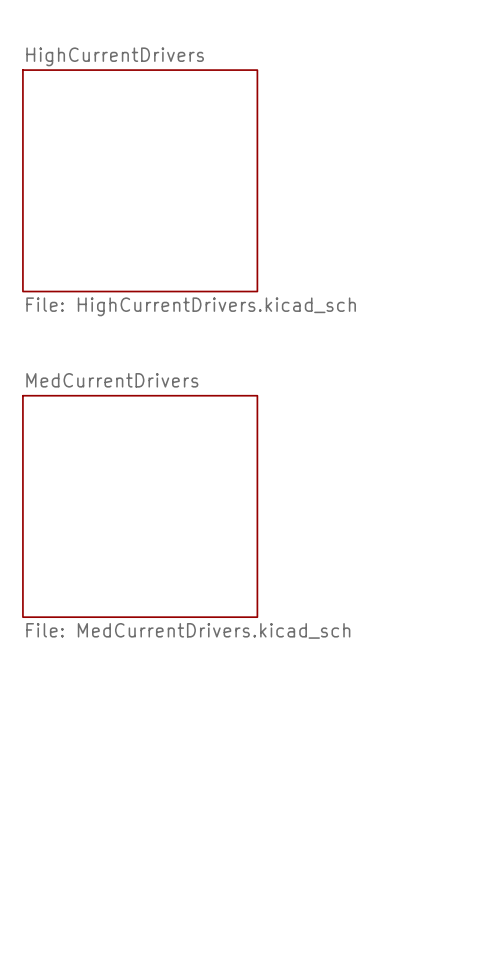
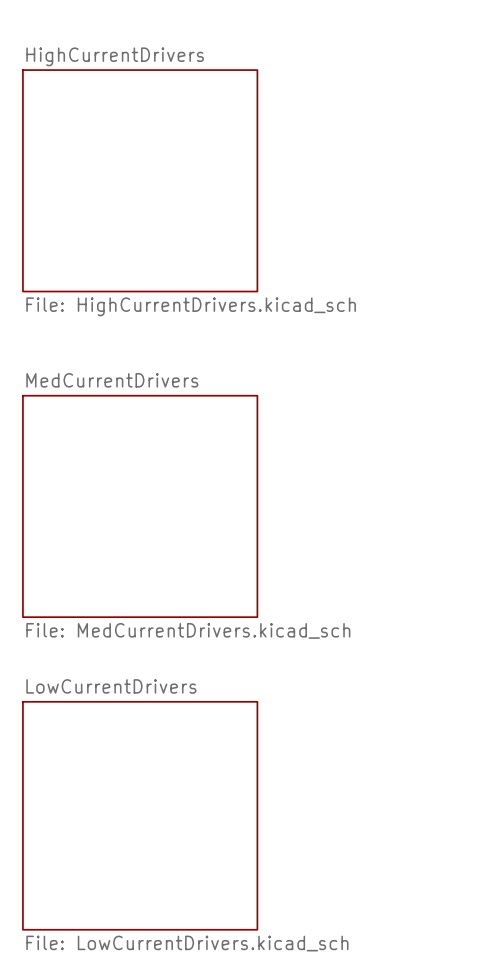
sheet LowCurrentDrivers: none -> File: LowCurrentDrivers.kicad_sch (140, 815)

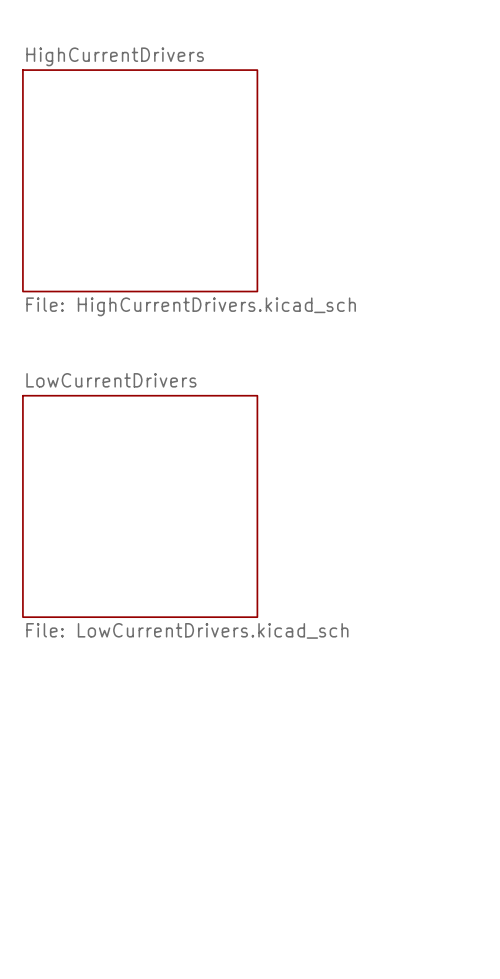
sheet MedCurrentDrivers name: MedCurrentDrivers (112, 380) -> LowCurrentDrivers (111, 380)
sheet MedCurrentDrivers value: File: MedCurrentDrivers.kicad_sch (188, 630) -> File: LowCurrentDrivers.kicad_sch (187, 630)
sheet LowCurrentDrivers: File: LowCurrentDrivers.kicad_sch (140, 815) -> none

